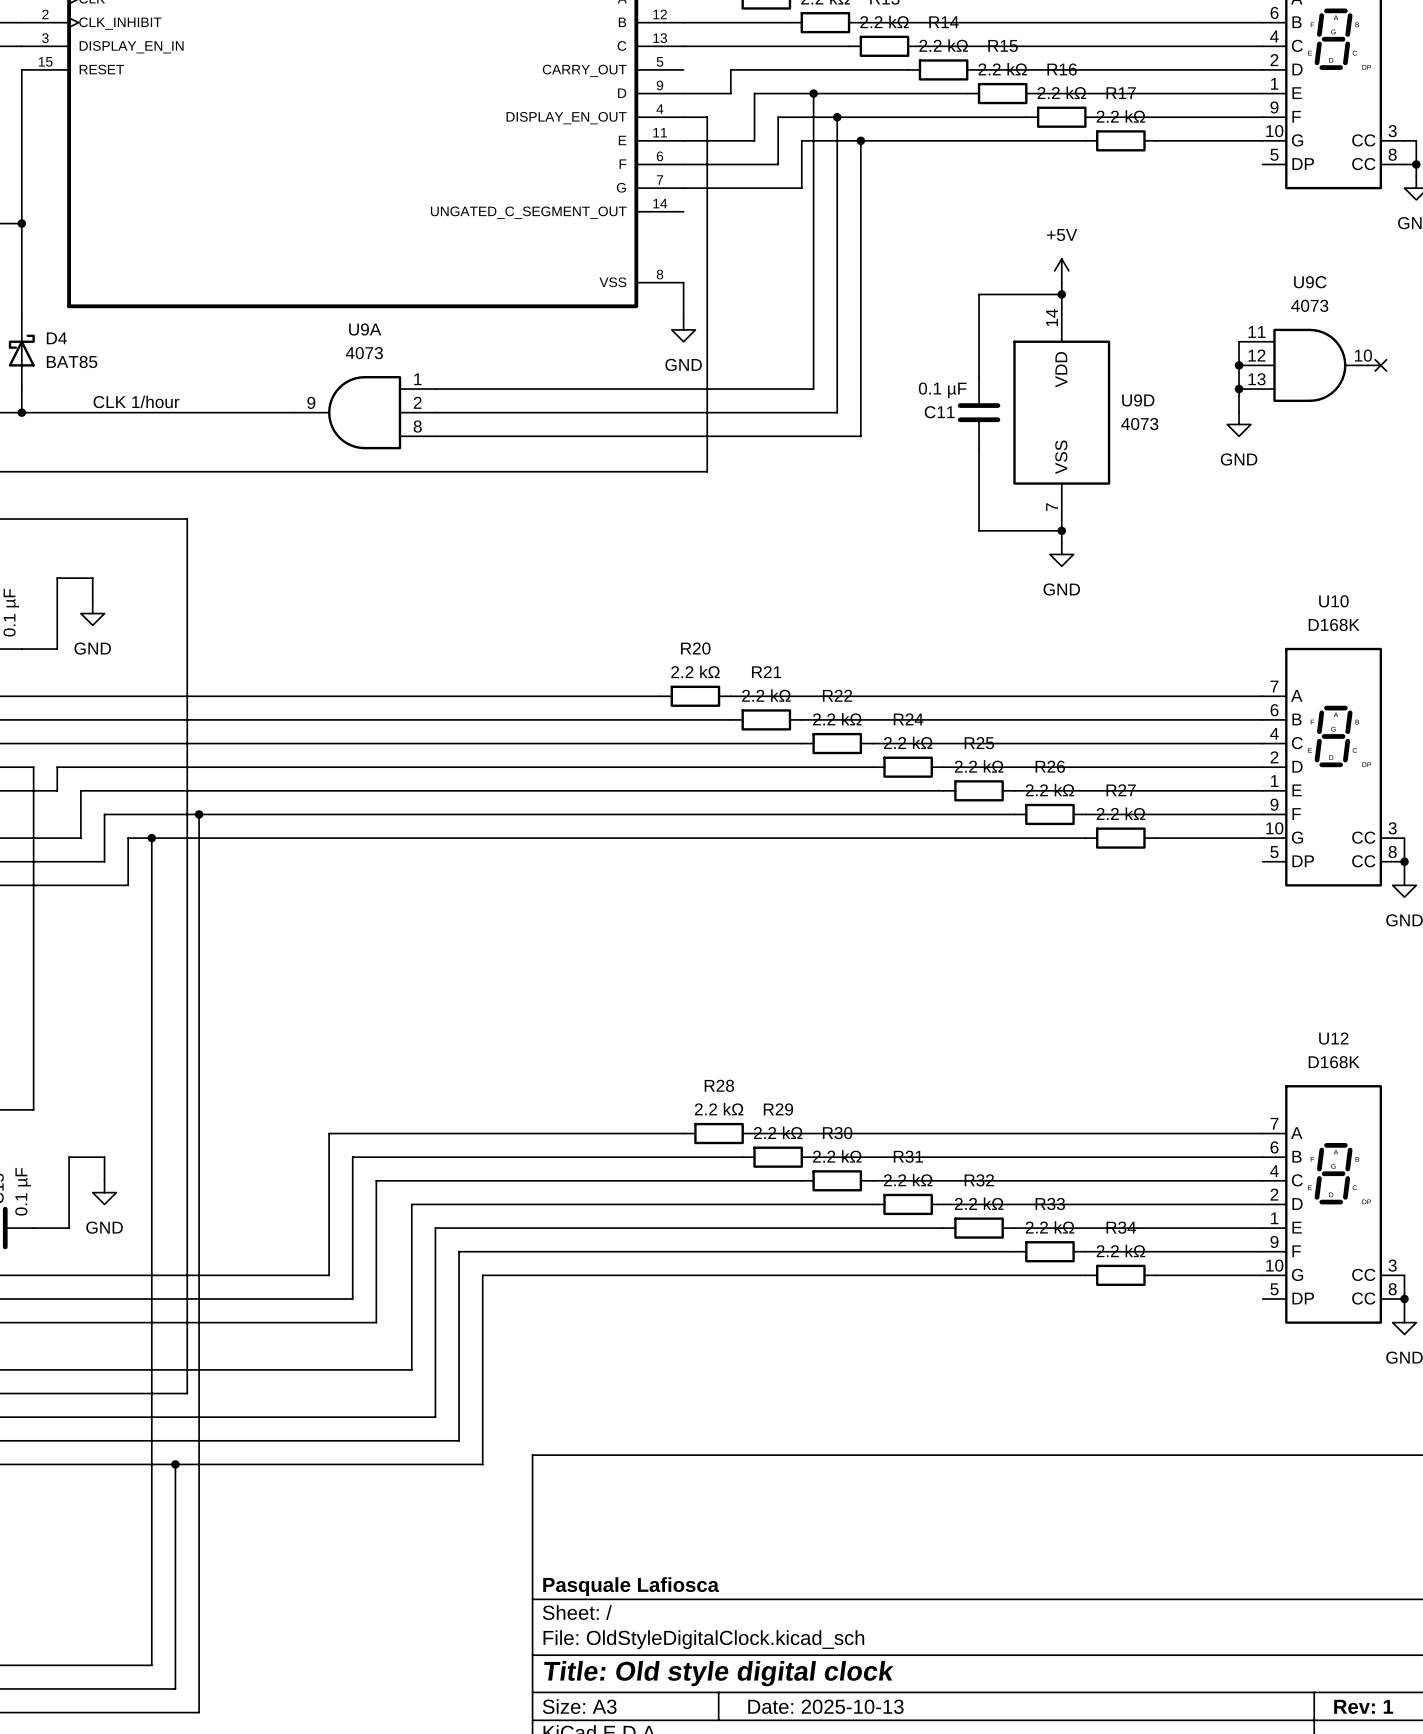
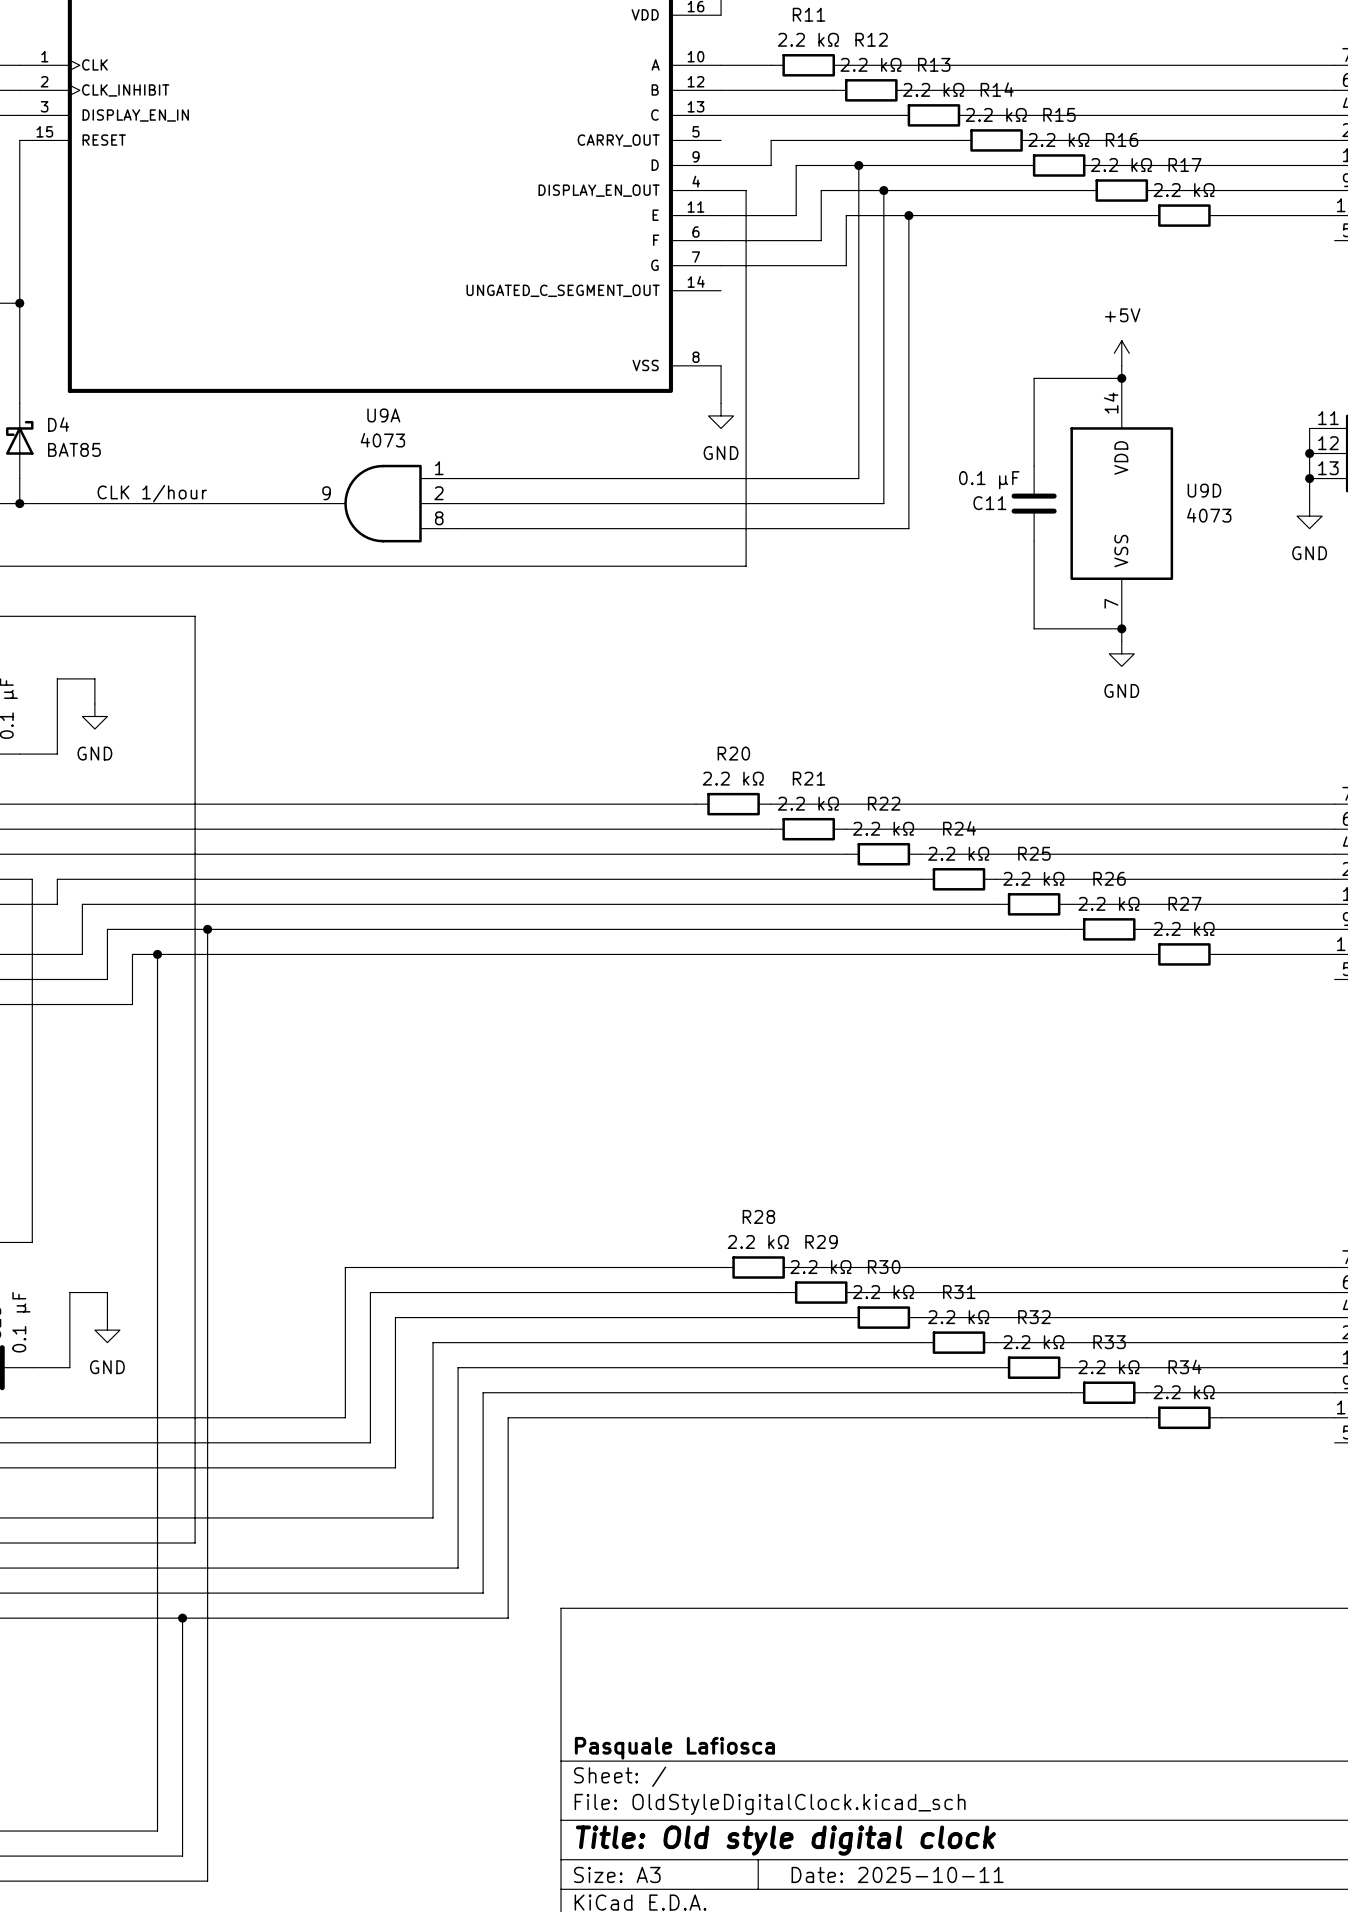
title block: Date: 2025-10-13 (825, 1706) -> Date: 2025-10-11 (897, 1874)

